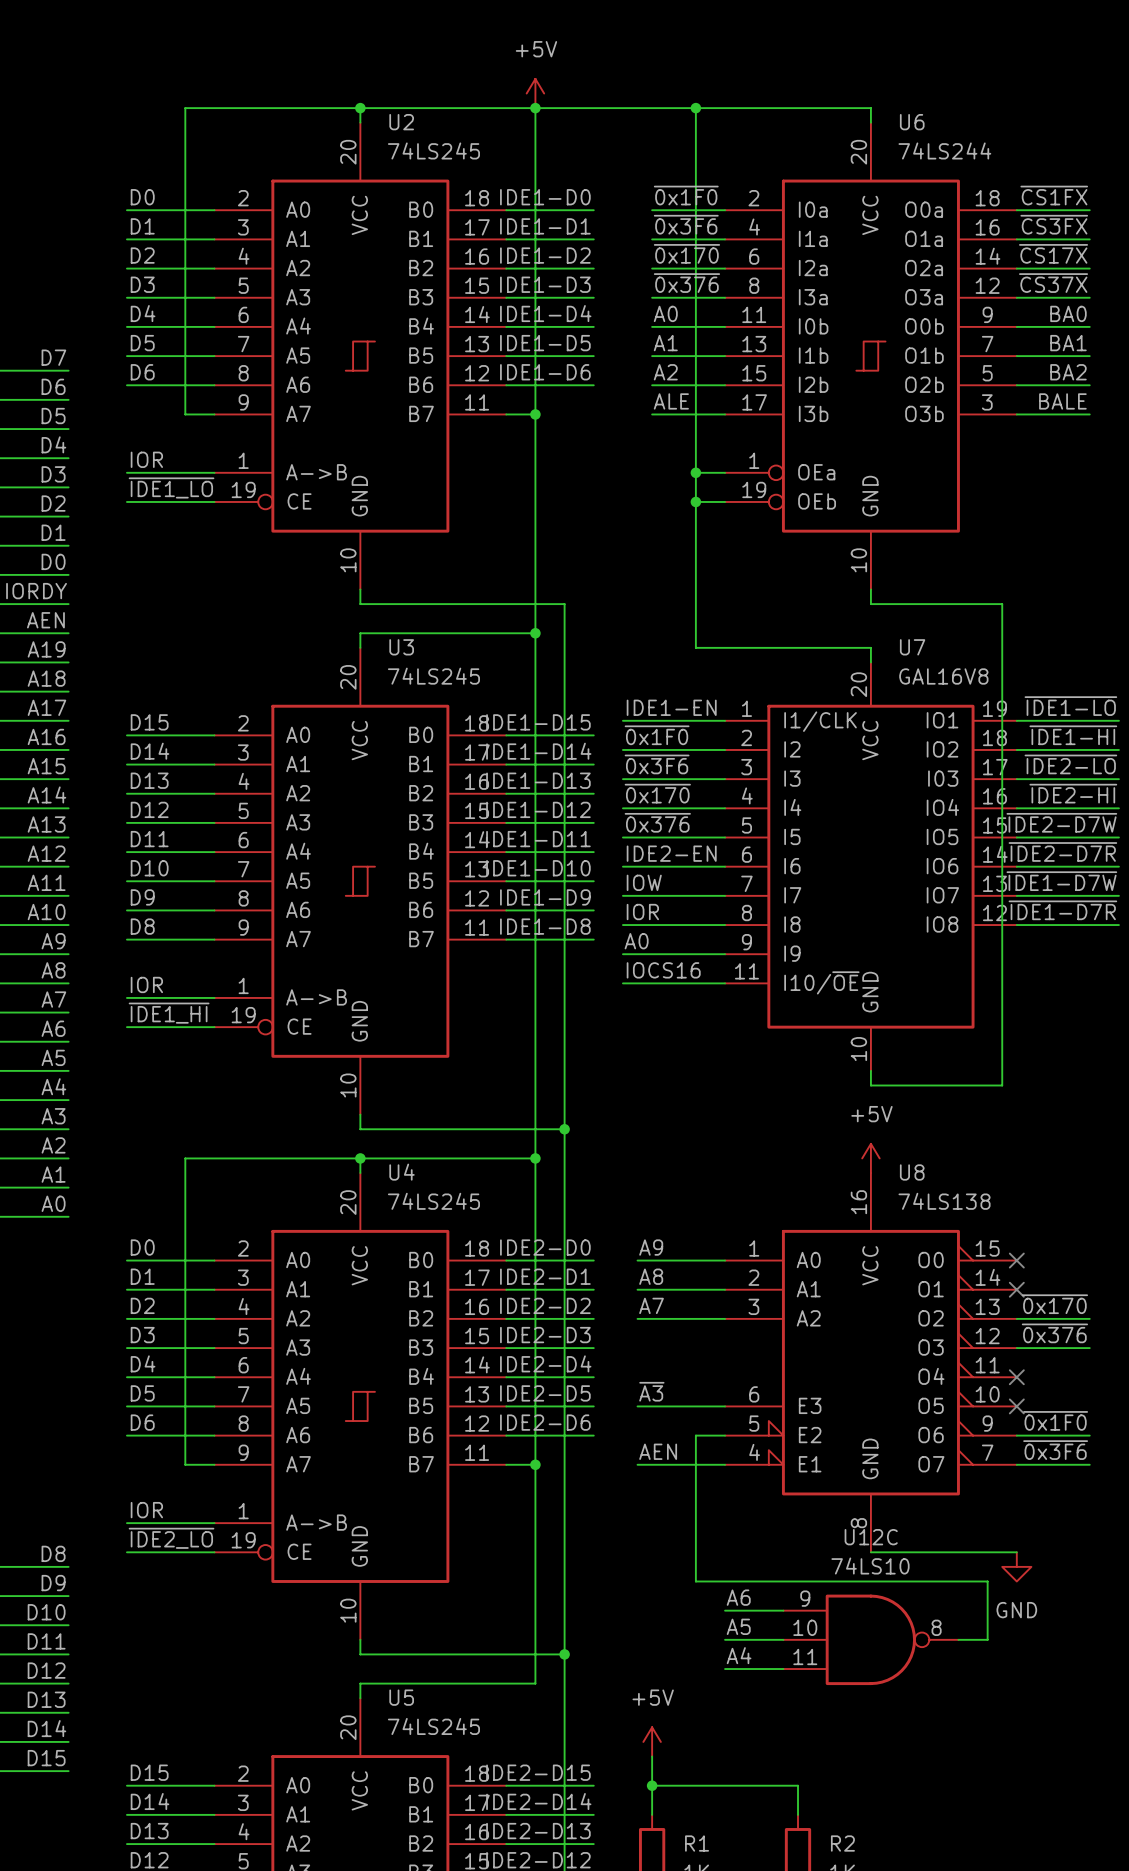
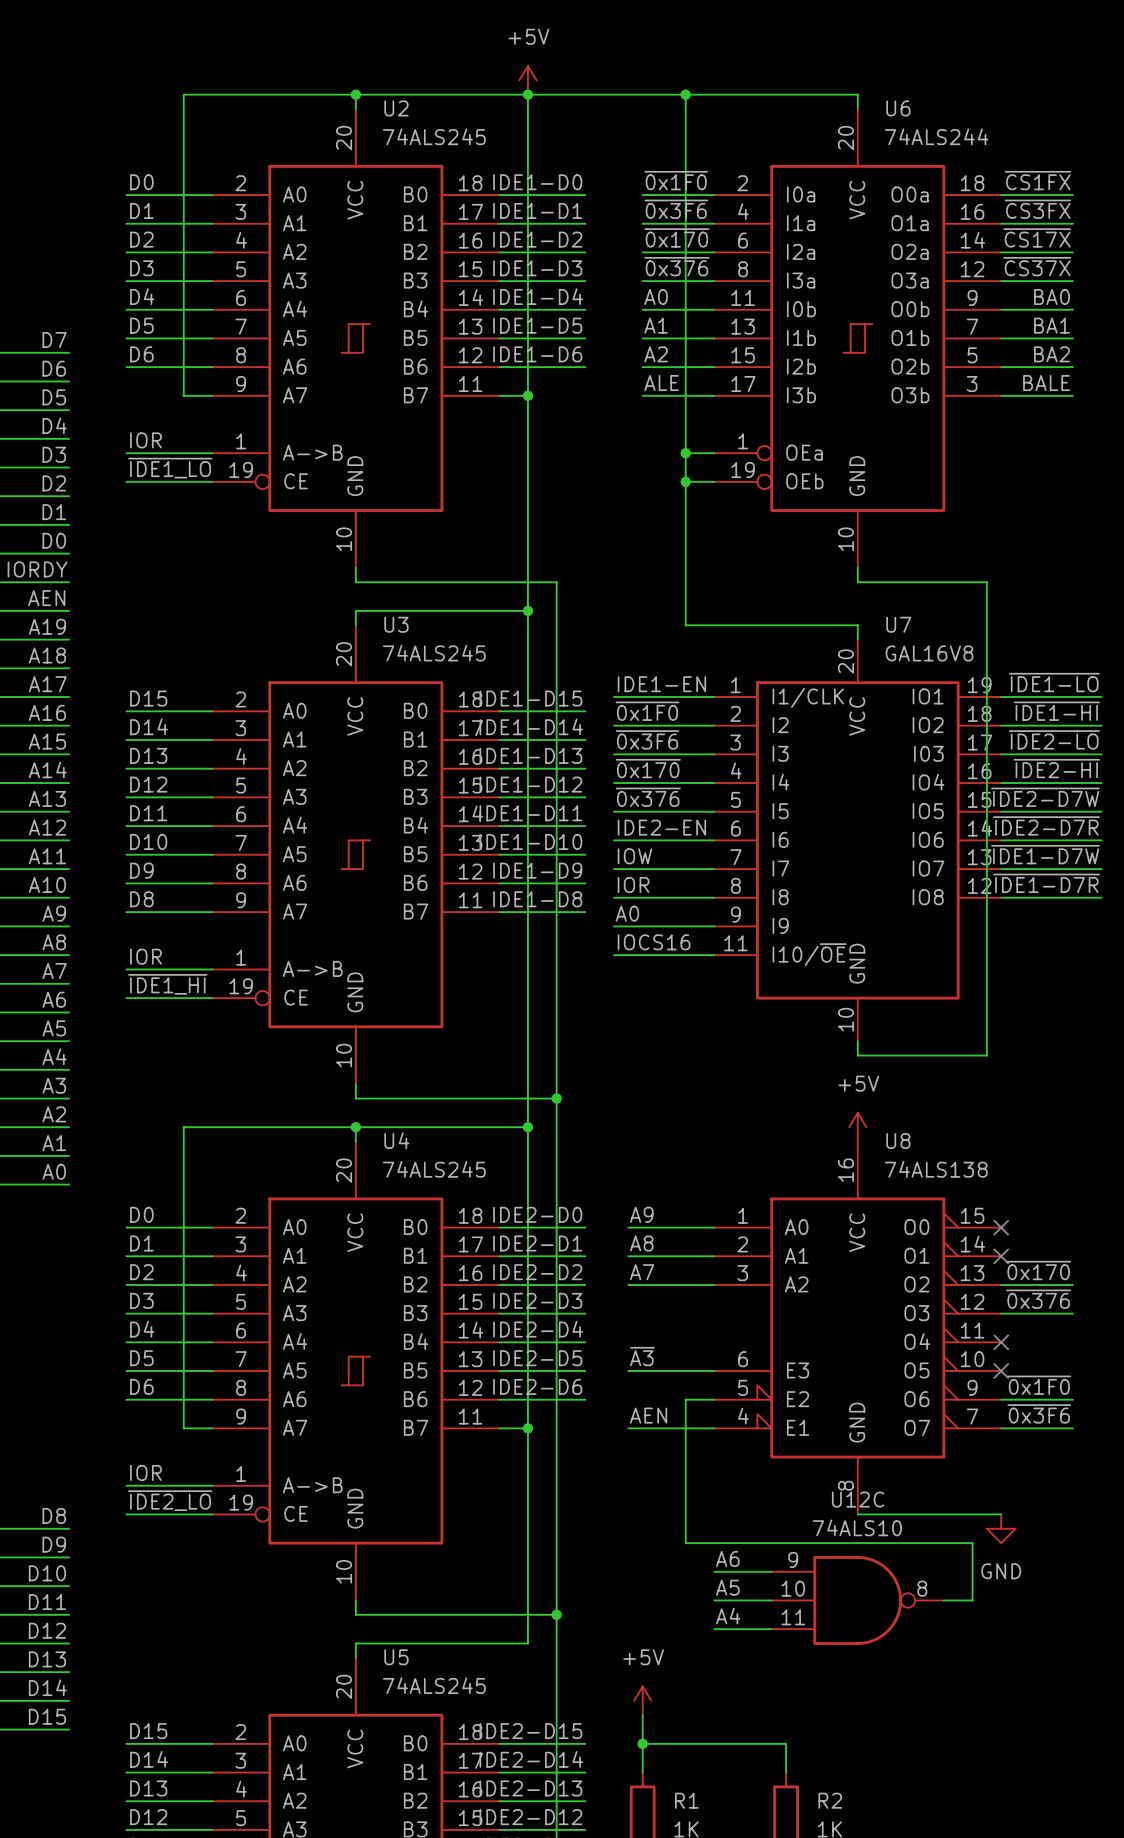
U2 value: 74LS245 (433, 150) -> 74ALS245 (434, 136)
U6 value: 74LS244 (944, 150) -> 74ALS244 (936, 136)
U3 value: 74LS245 (433, 676) -> 74ALS245 (434, 653)
U4 value: 74LS245 (433, 1201) -> 74ALS245 (434, 1169)
U8 value: 74LS138 (944, 1201) -> 74ALS138 (936, 1169)
U12C value: 74LS10 (870, 1566) -> 74ALS10 (857, 1527)
U5 value: 74LS245 (433, 1726) -> 74ALS245 (434, 1685)

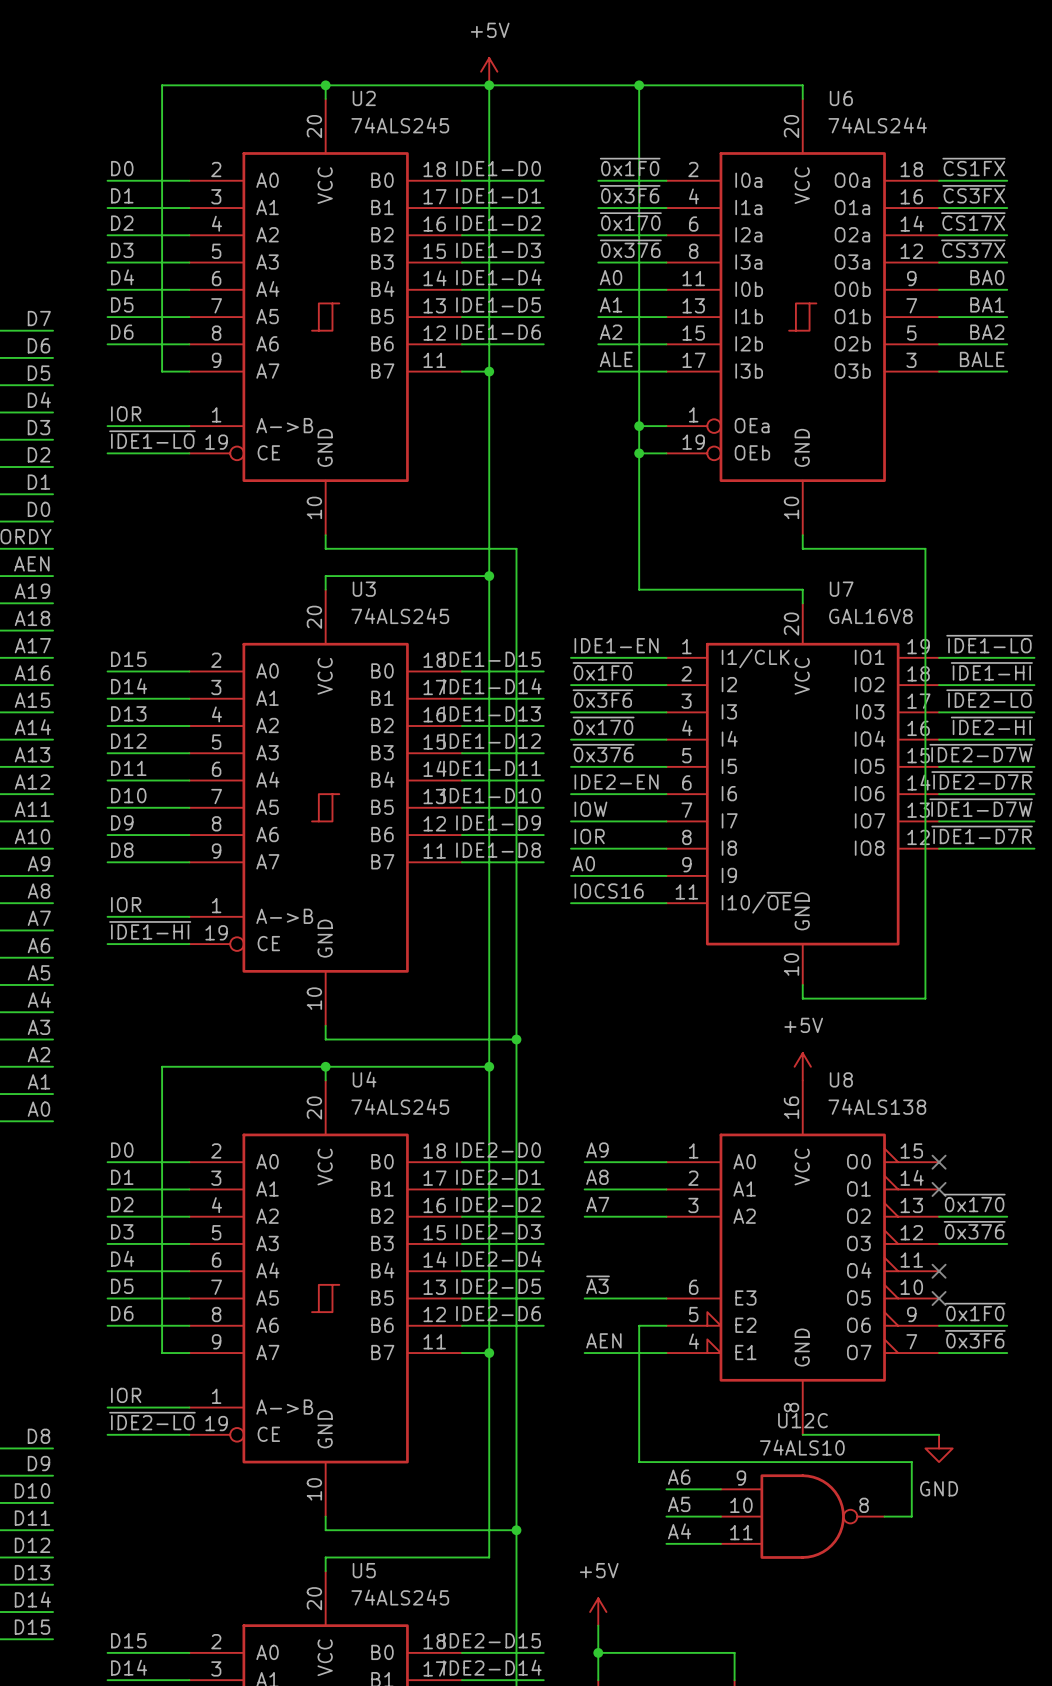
label: ~{IDE1_LO} (170, 468) -> ~{IDE1-LO} (152, 439)
label: ~{IDE1_HI} (167, 984) -> ~{IDE1-HI} (150, 930)
label: ~{IDE2_LO} (170, 1500) -> ~{IDE2-LO} (152, 1421)

